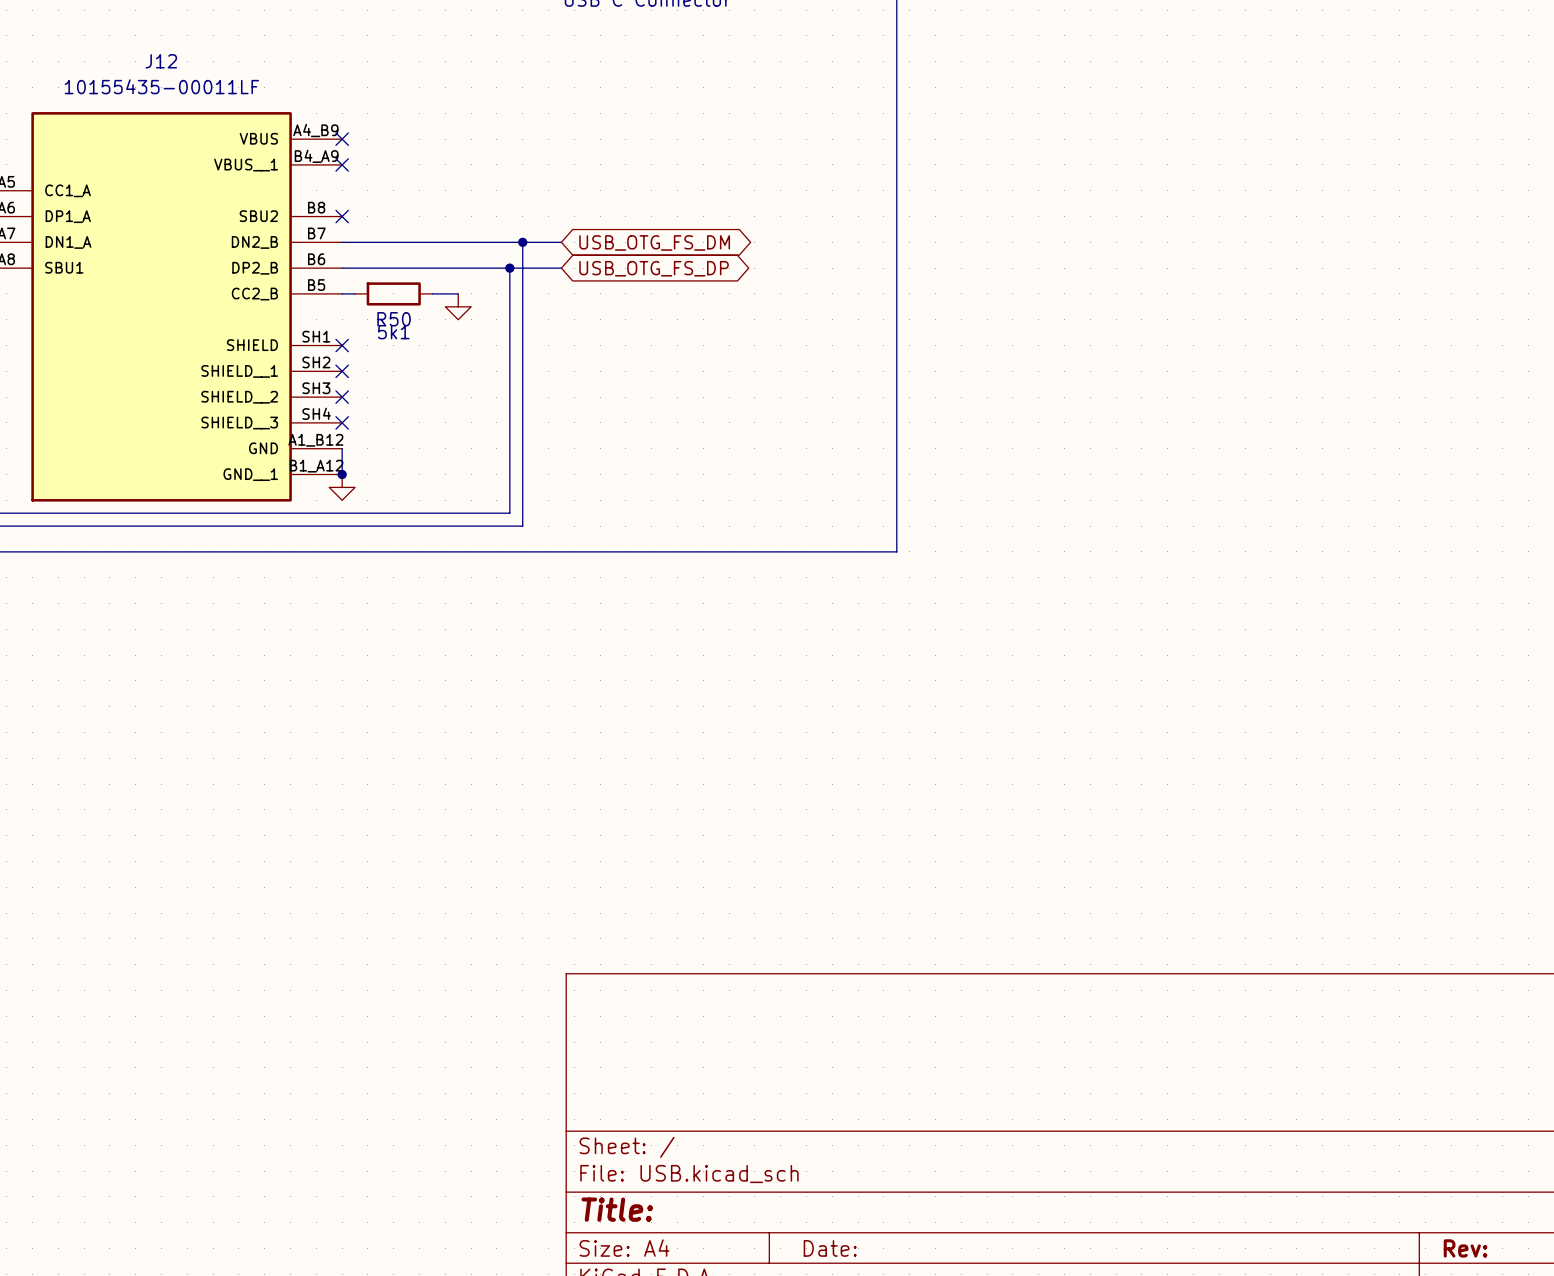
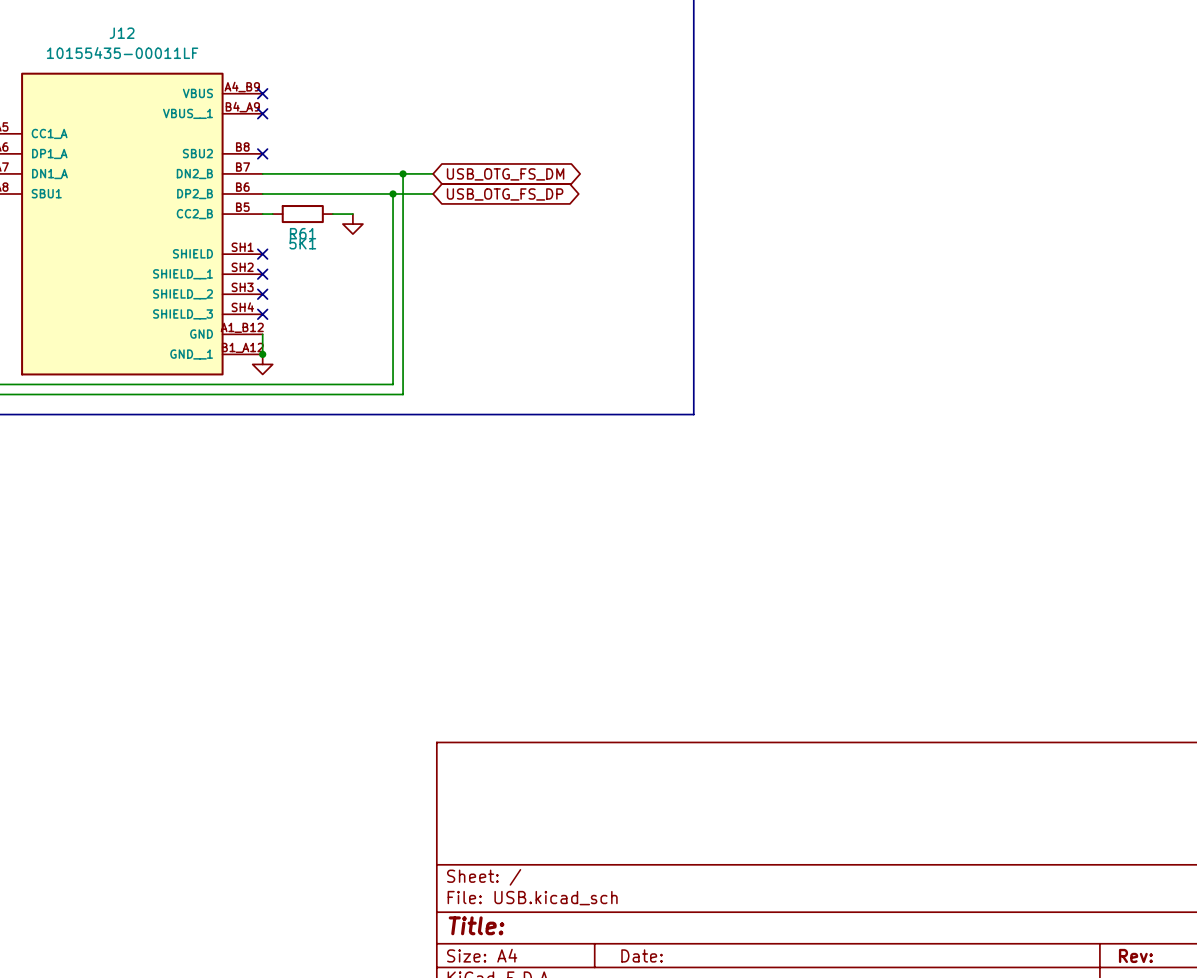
R50 name: R50 (394, 319) -> R61 (303, 233)
R50 value: 5k1 (393, 332) -> 5K1 (302, 243)

